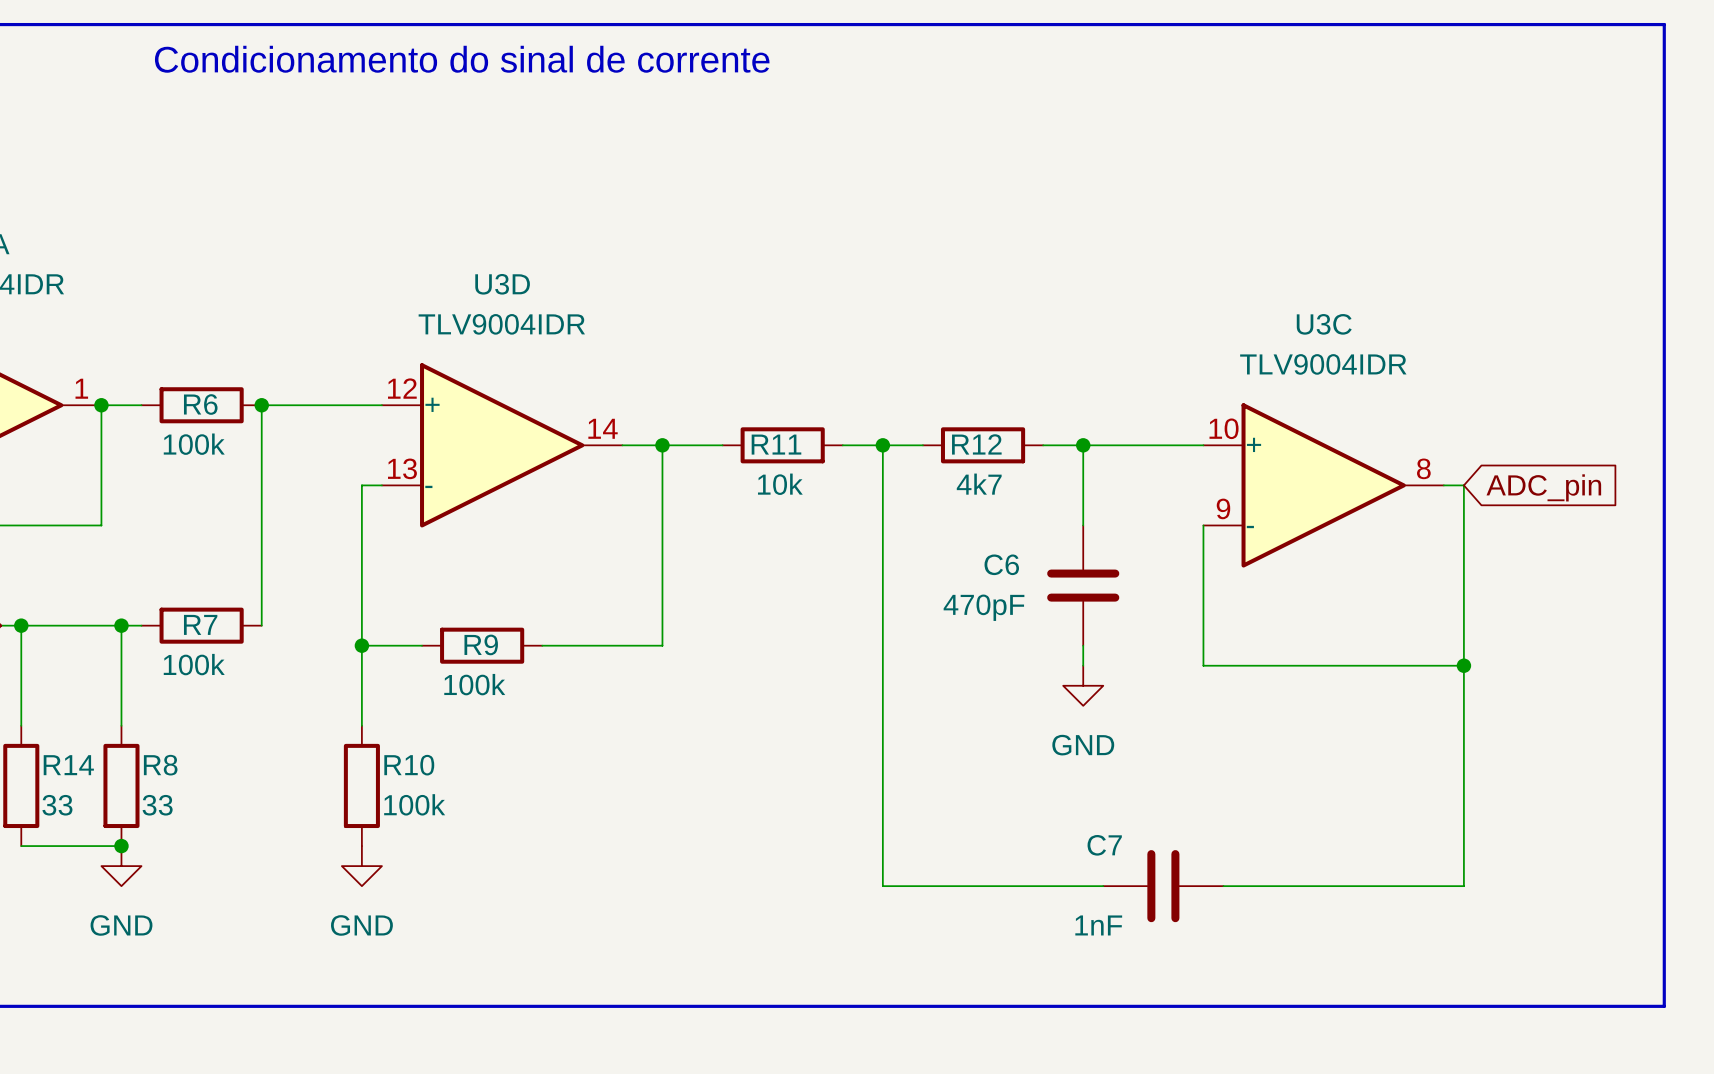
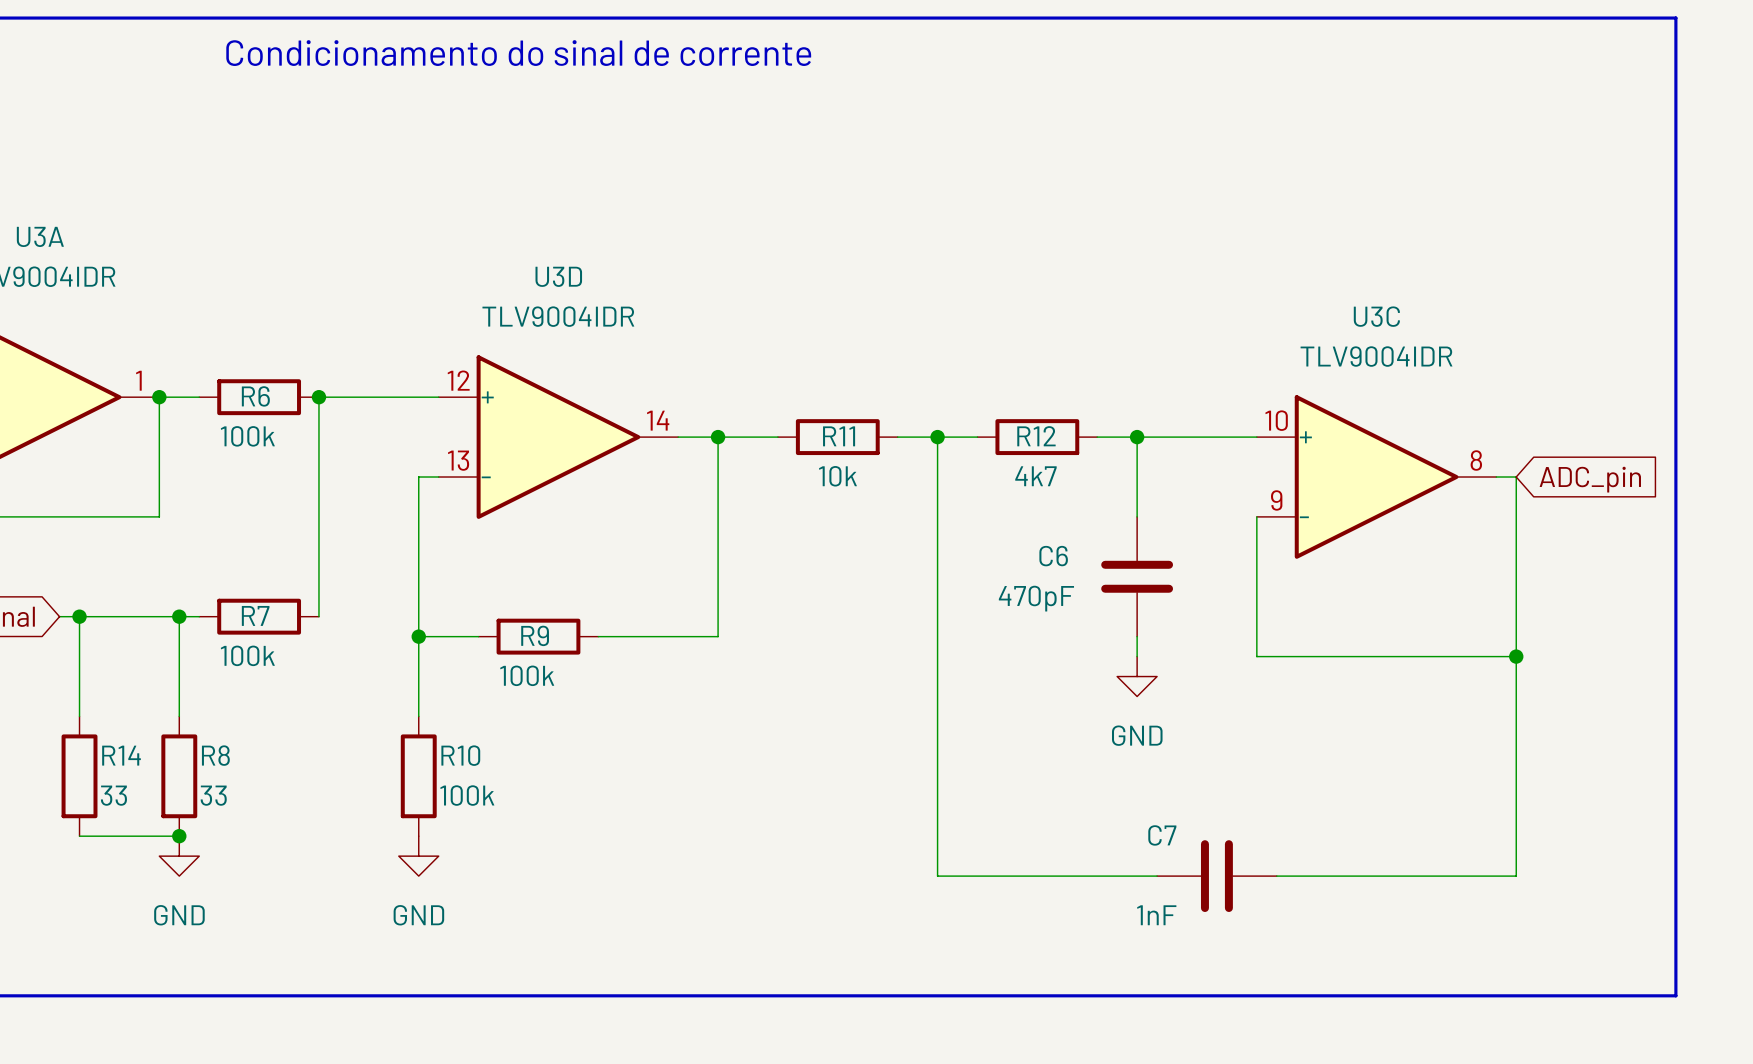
line: (1624, 24) (1664, 24) (1664, 1006) (1624, 1006) -> (1675, 18) (1675, 995)

